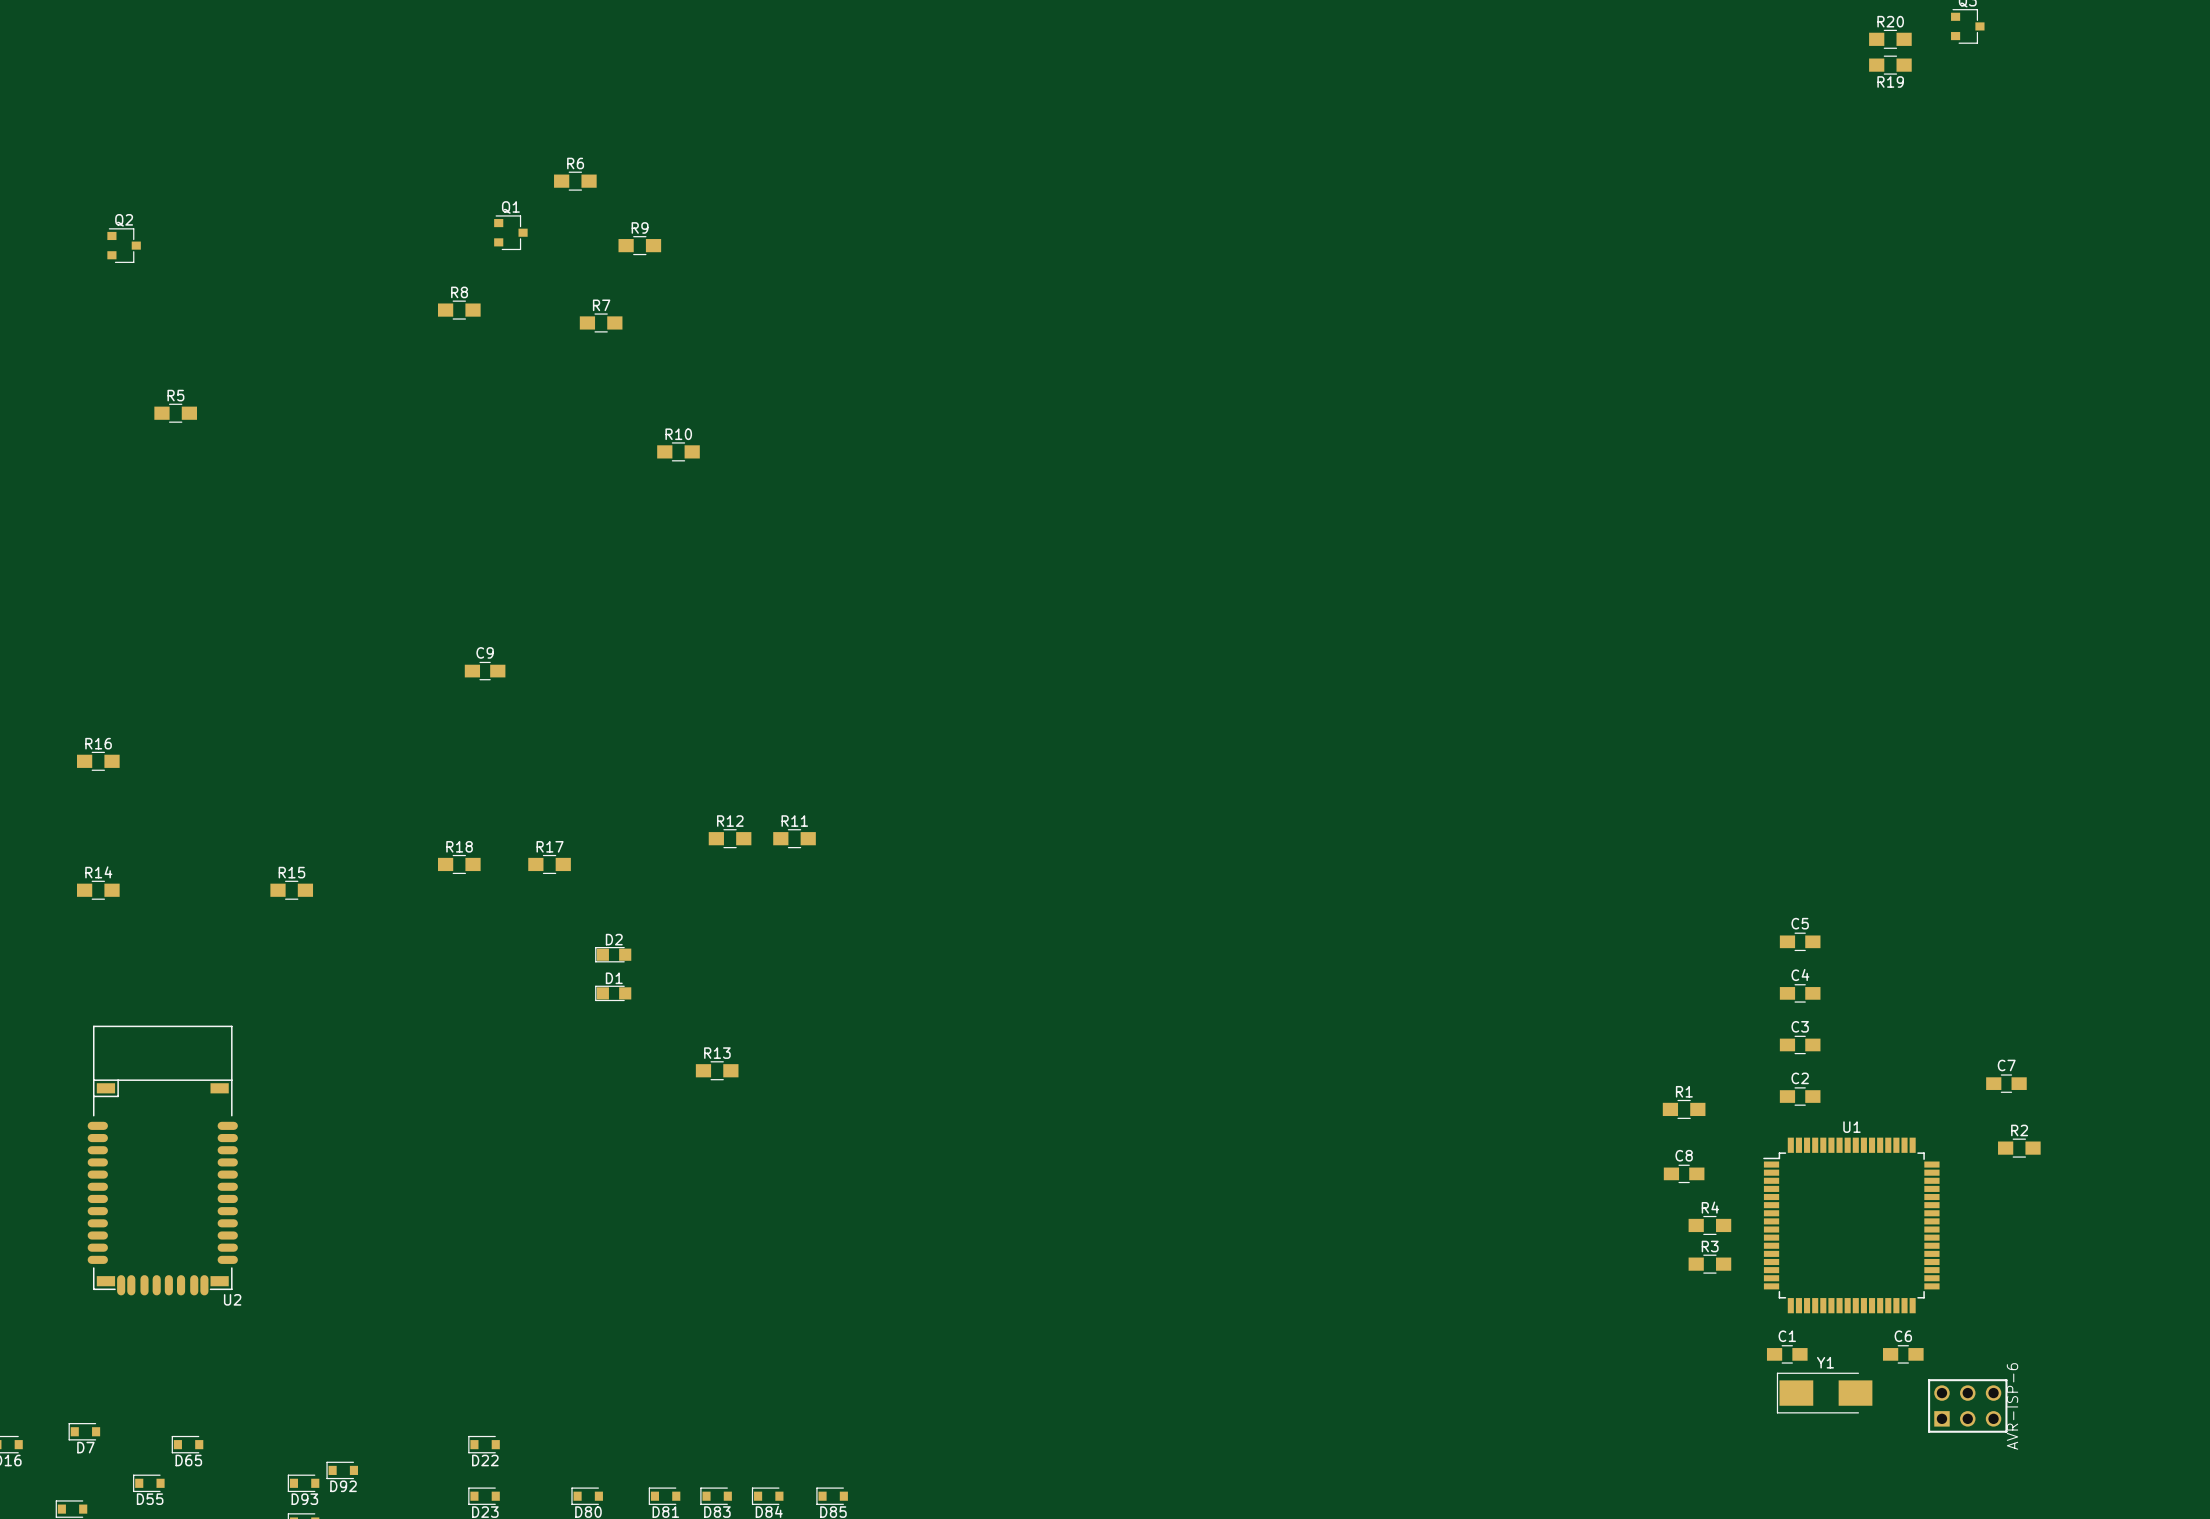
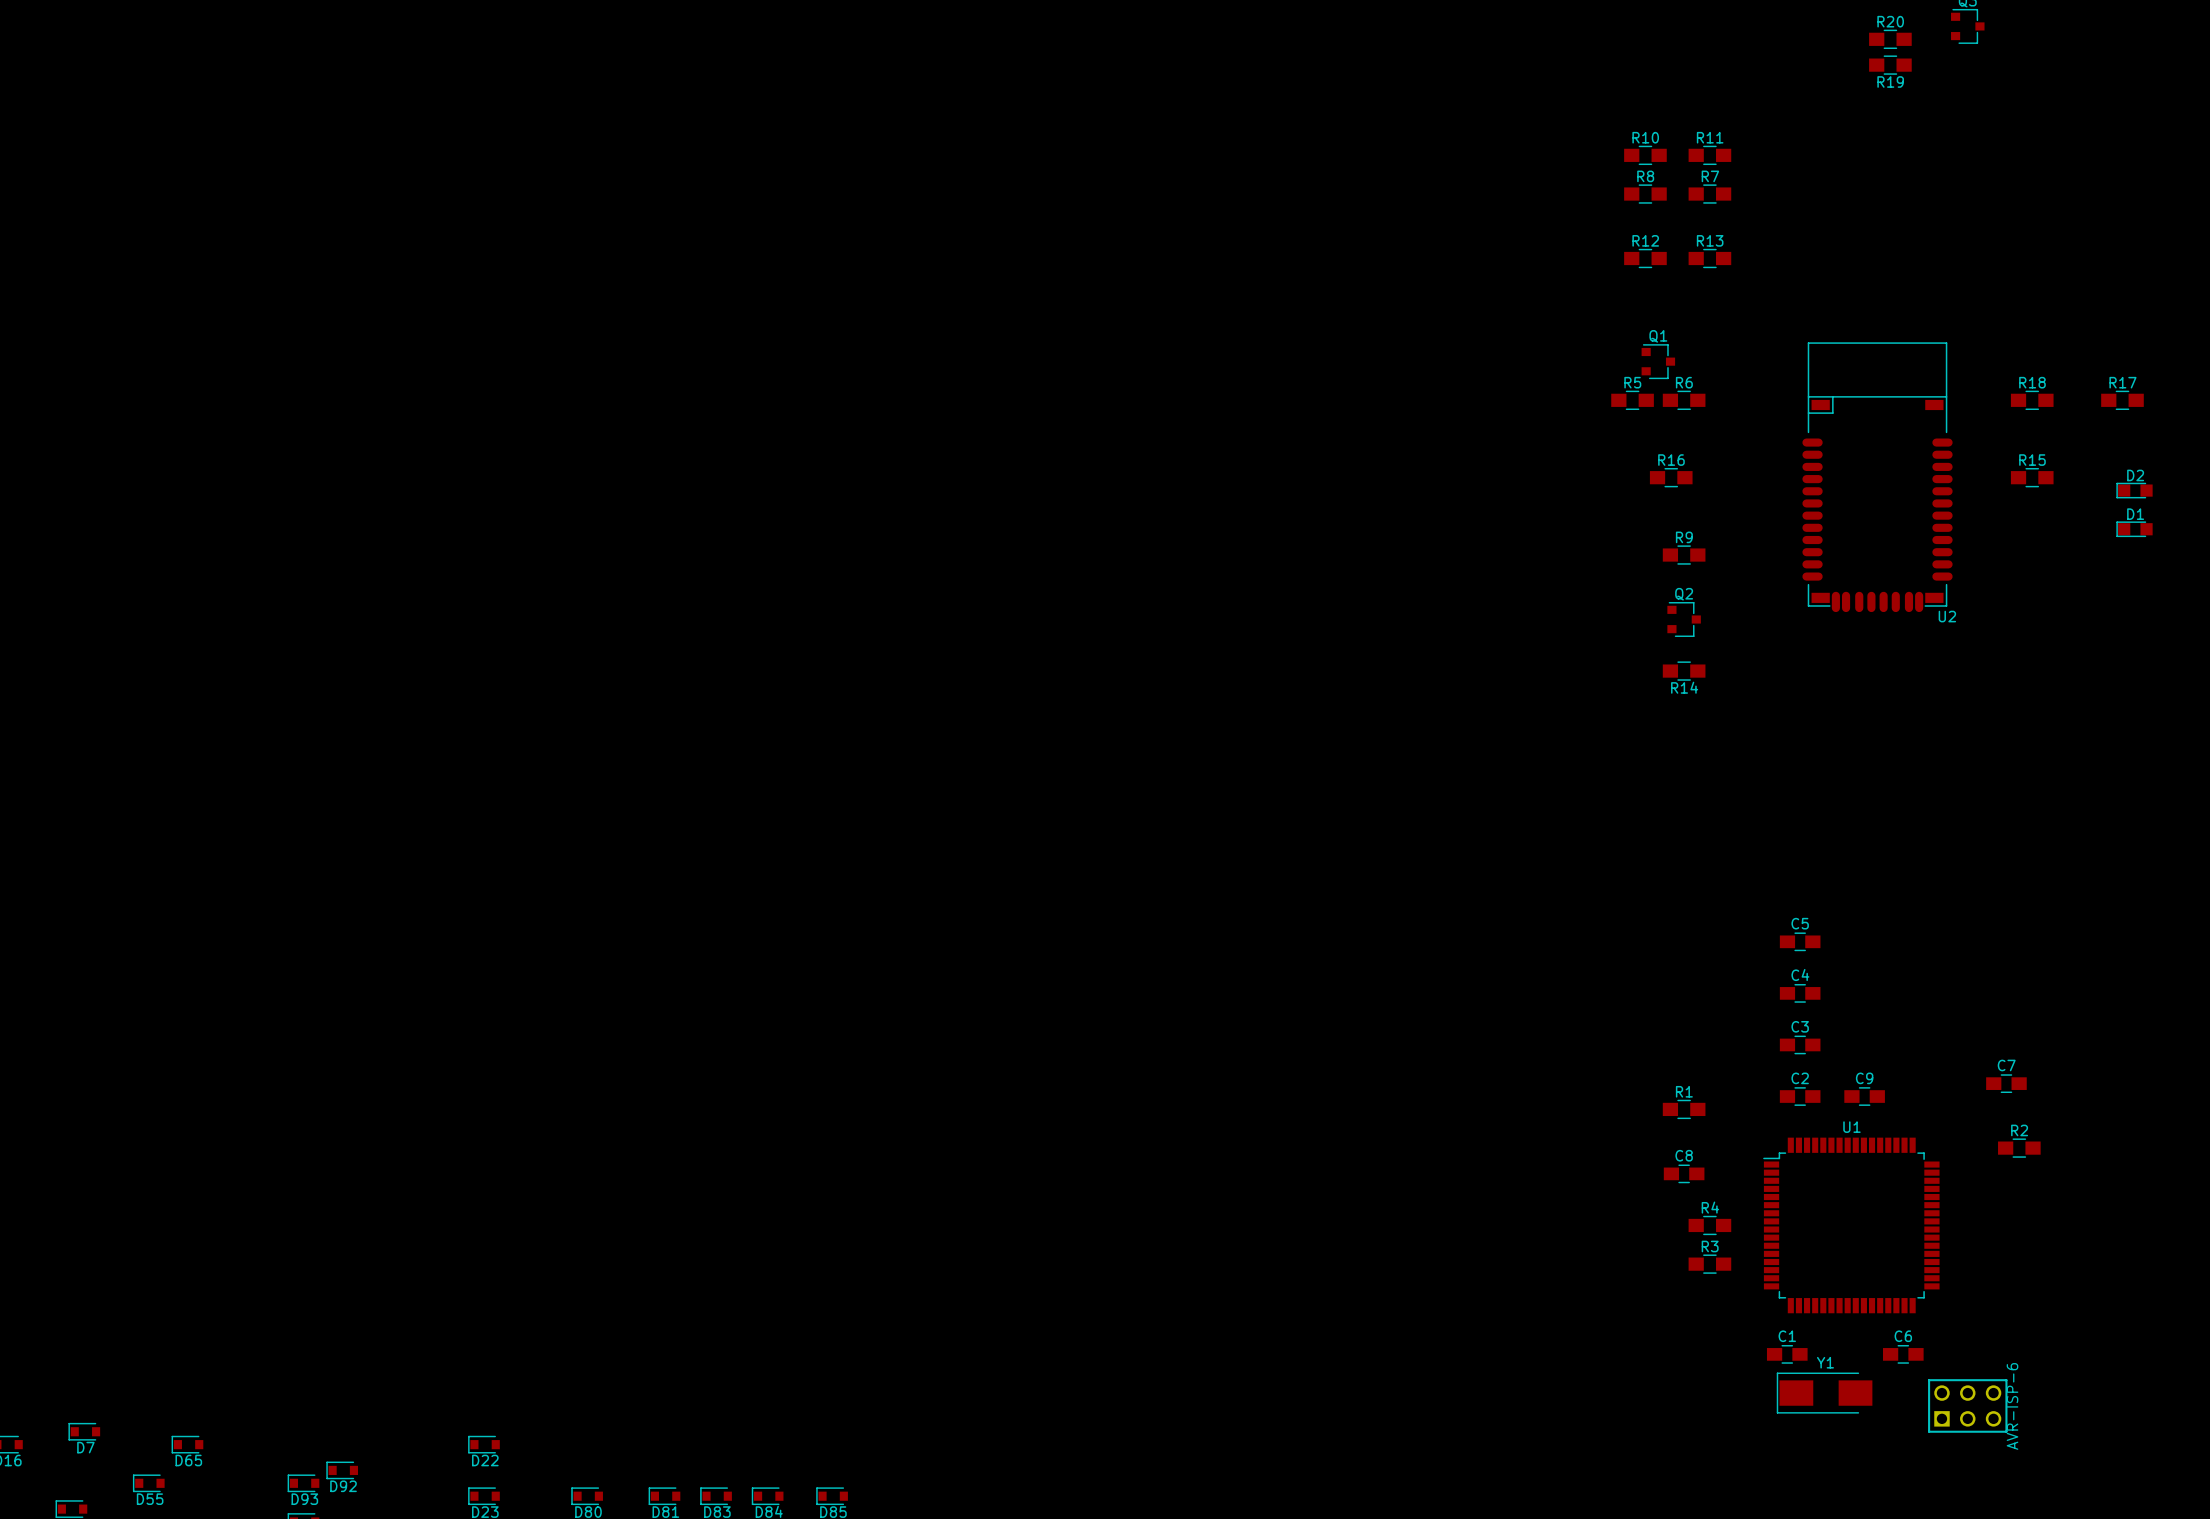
R6 position: (575, 181) -> (1684, 400)
Q1 position: (510, 232) -> (1658, 361)
Q2 position: (124, 245) -> (1684, 619)
R9 position: (639, 245) -> (1684, 555)
R8 position: (459, 310) -> (1645, 194)
R7 position: (601, 322) -> (1709, 194)
R5 position: (175, 413) -> (1632, 400)
R10 position: (678, 451) -> (1645, 155)
C9 position: (485, 671) -> (1864, 1096)
R16 position: (98, 761) -> (1671, 477)
R12 position: (730, 838) -> (1645, 258)
R11 position: (794, 838) -> (1709, 155)
R18 position: (459, 864) -> (2032, 400)
R17 position: (549, 864) -> (2122, 400)
R14 name position: R14 (98, 872) -> R14 (1684, 687)
R14 position: (98, 890) -> (1684, 671)
R15 position: (291, 890) -> (2032, 477)
D2 position: (613, 954) -> (2134, 490)
D1 position: (613, 993) -> (2134, 529)
R13 position: (717, 1070) -> (1709, 258)
U2 position: (162, 1160) -> (1877, 477)

